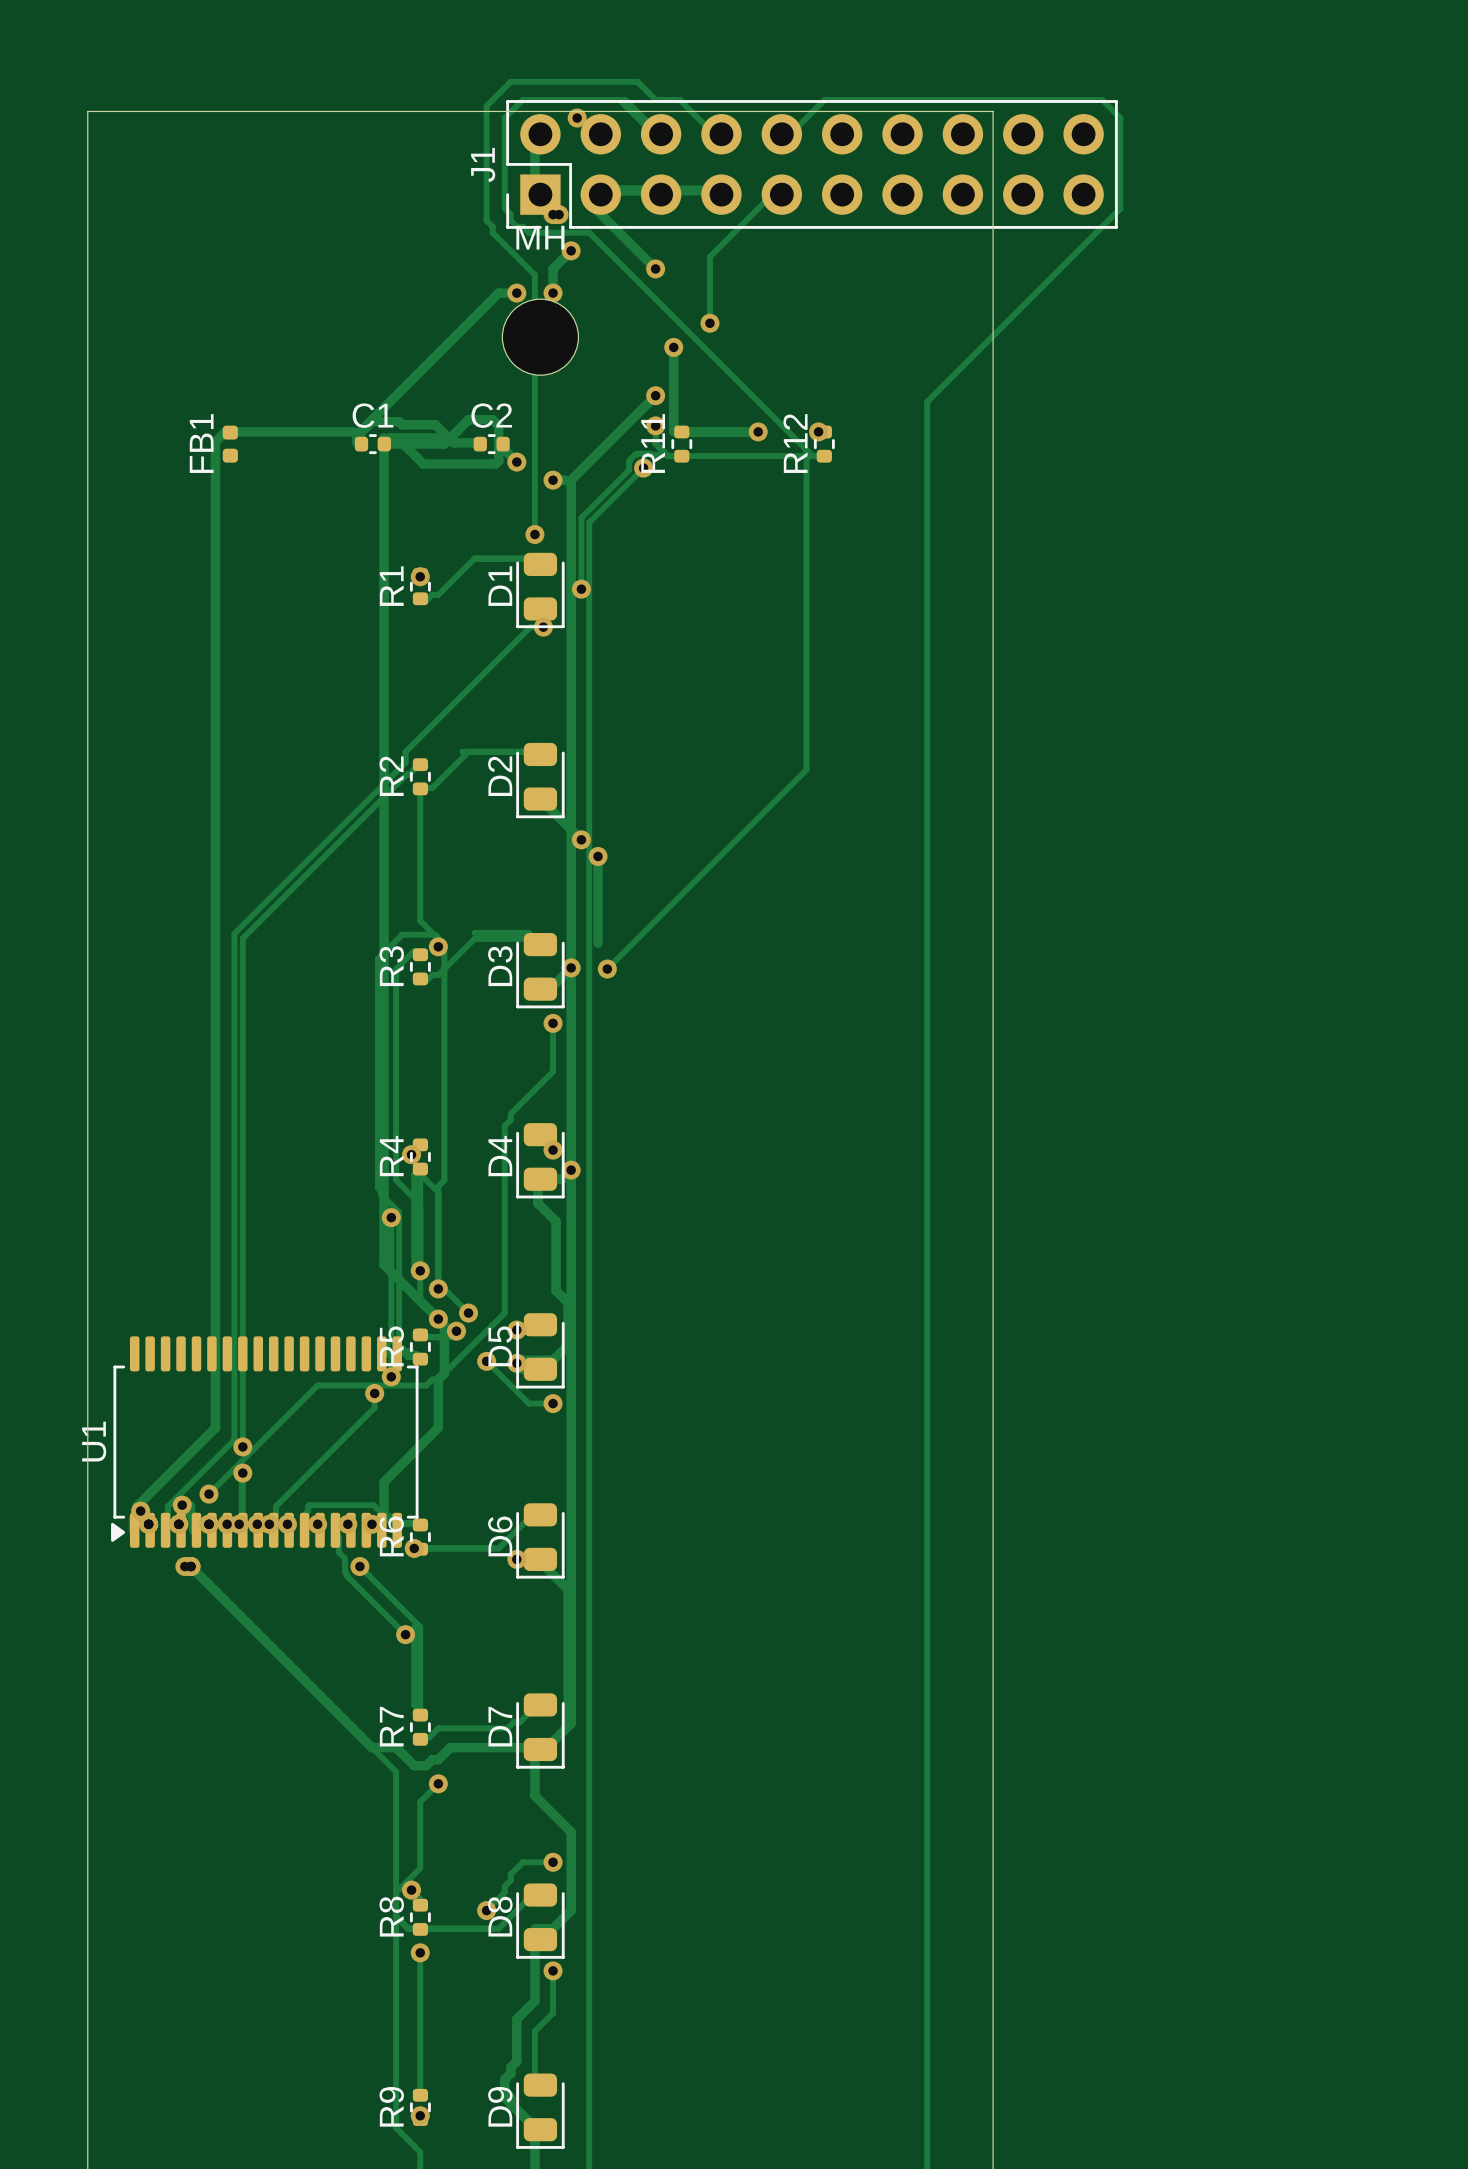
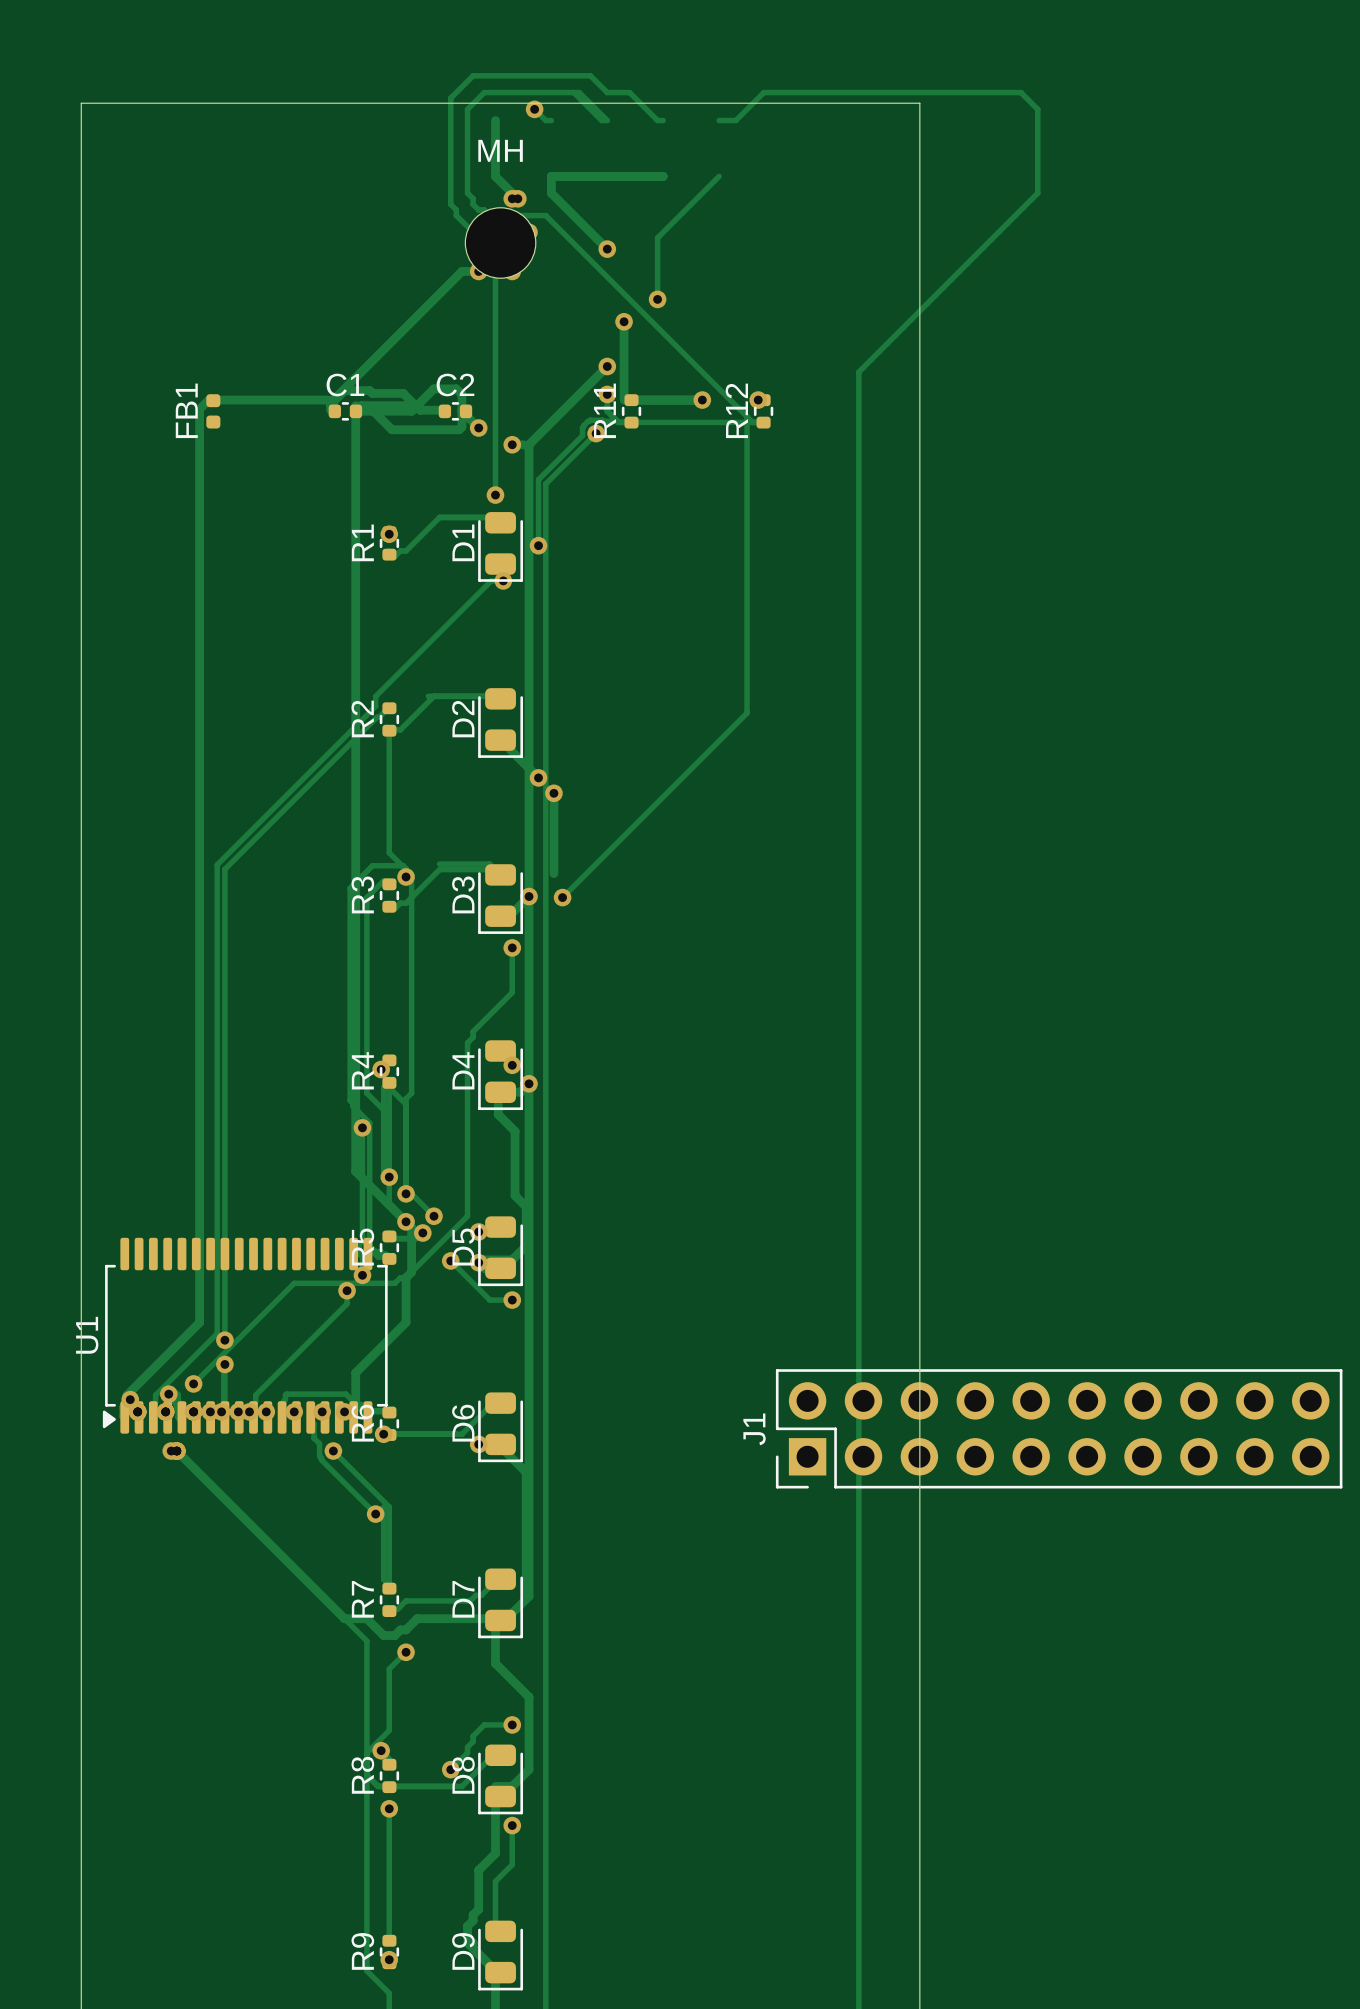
J1 position: (812, 164) -> (1059, 1428)
MH position: (540, 337) -> (500, 242)

